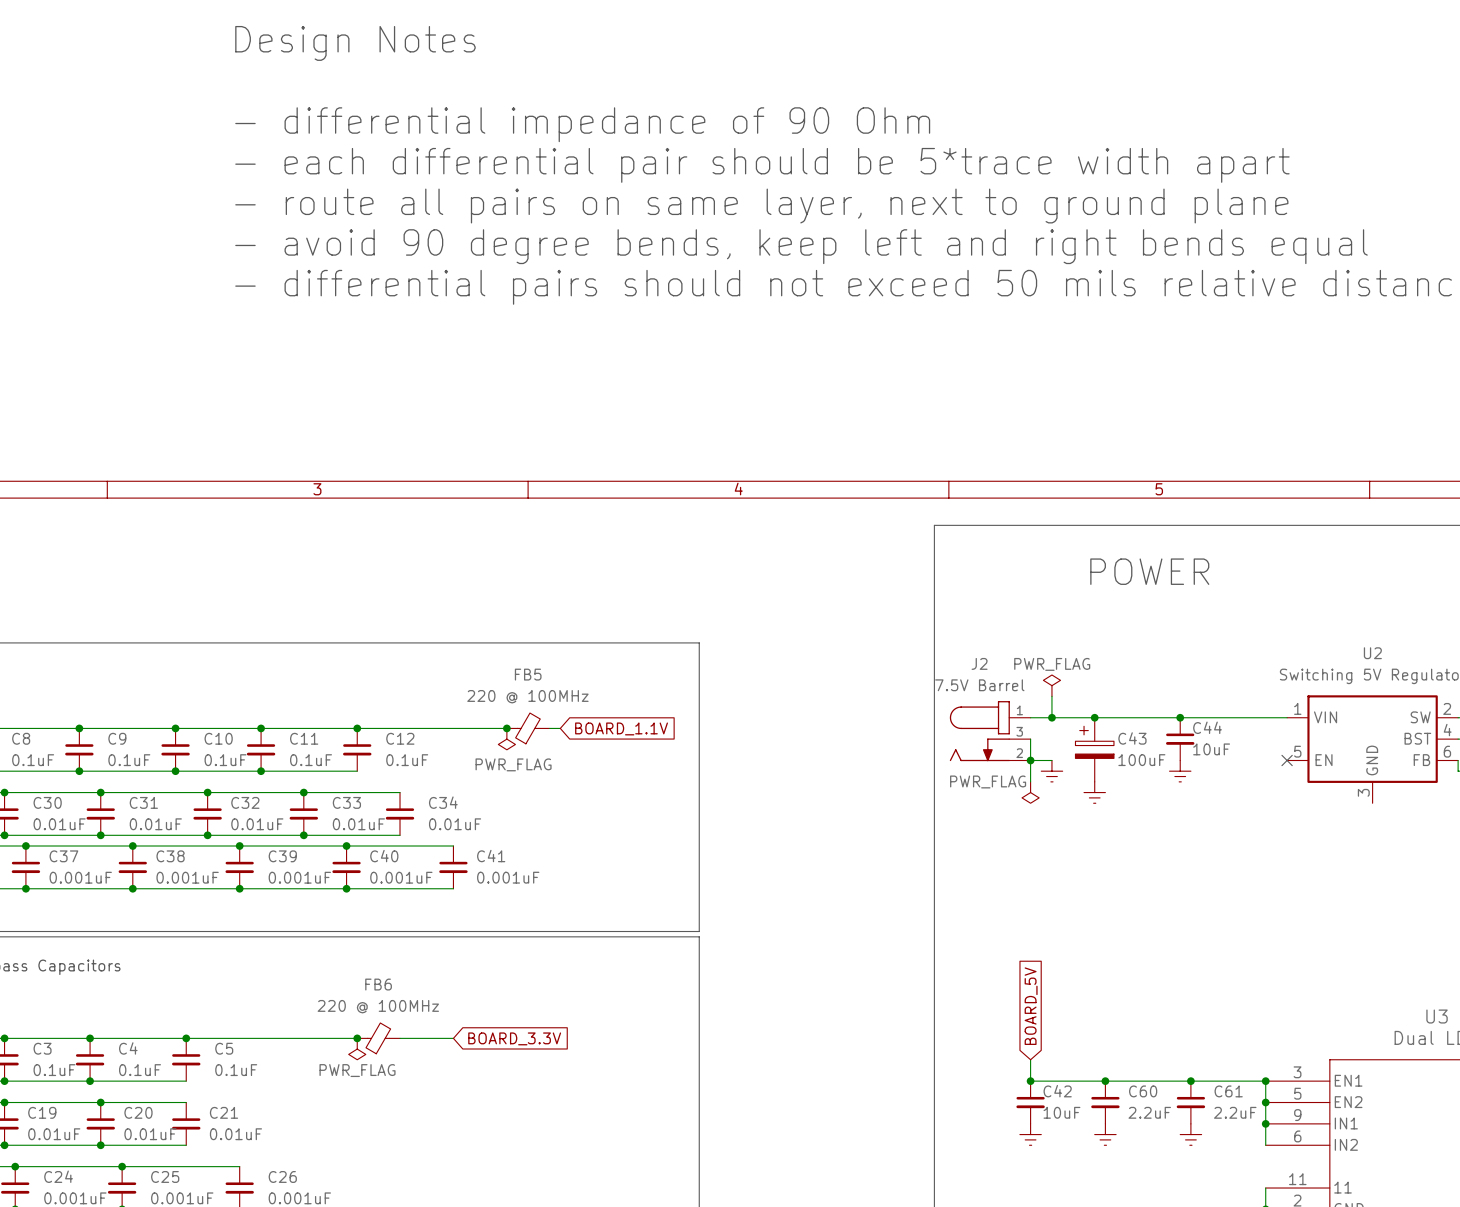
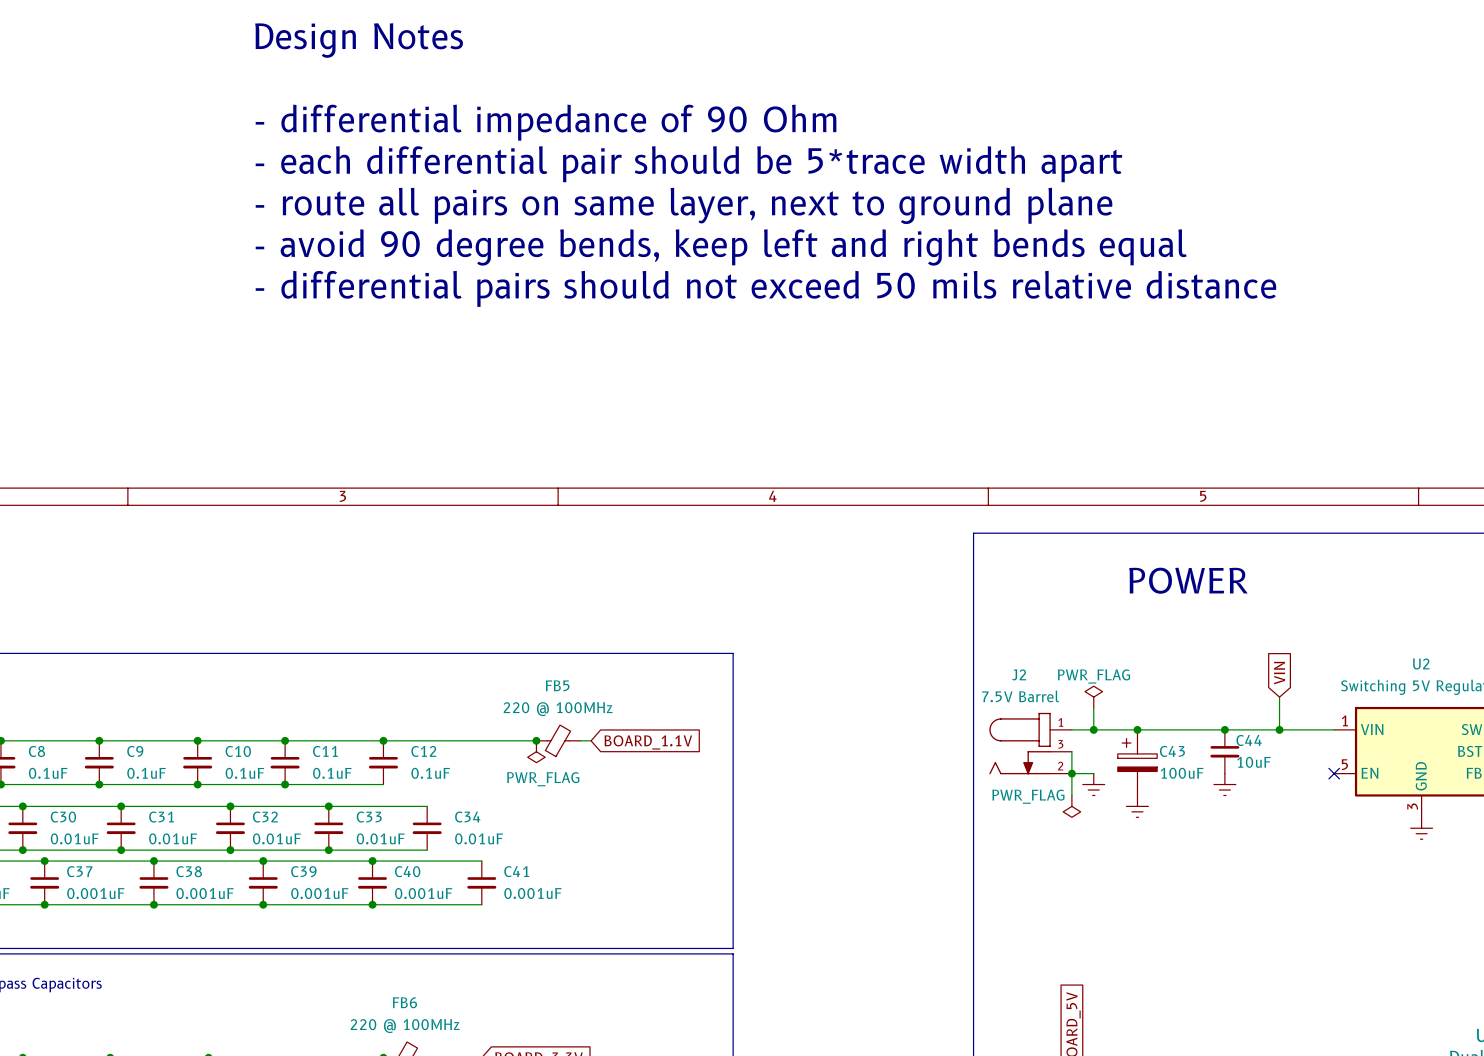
global label: none -> VIN (1279, 673)
wire: none -> (1279, 697) (1279, 729)
junction: none -> (1279, 729)
power symbol: none -> (1421, 828)

